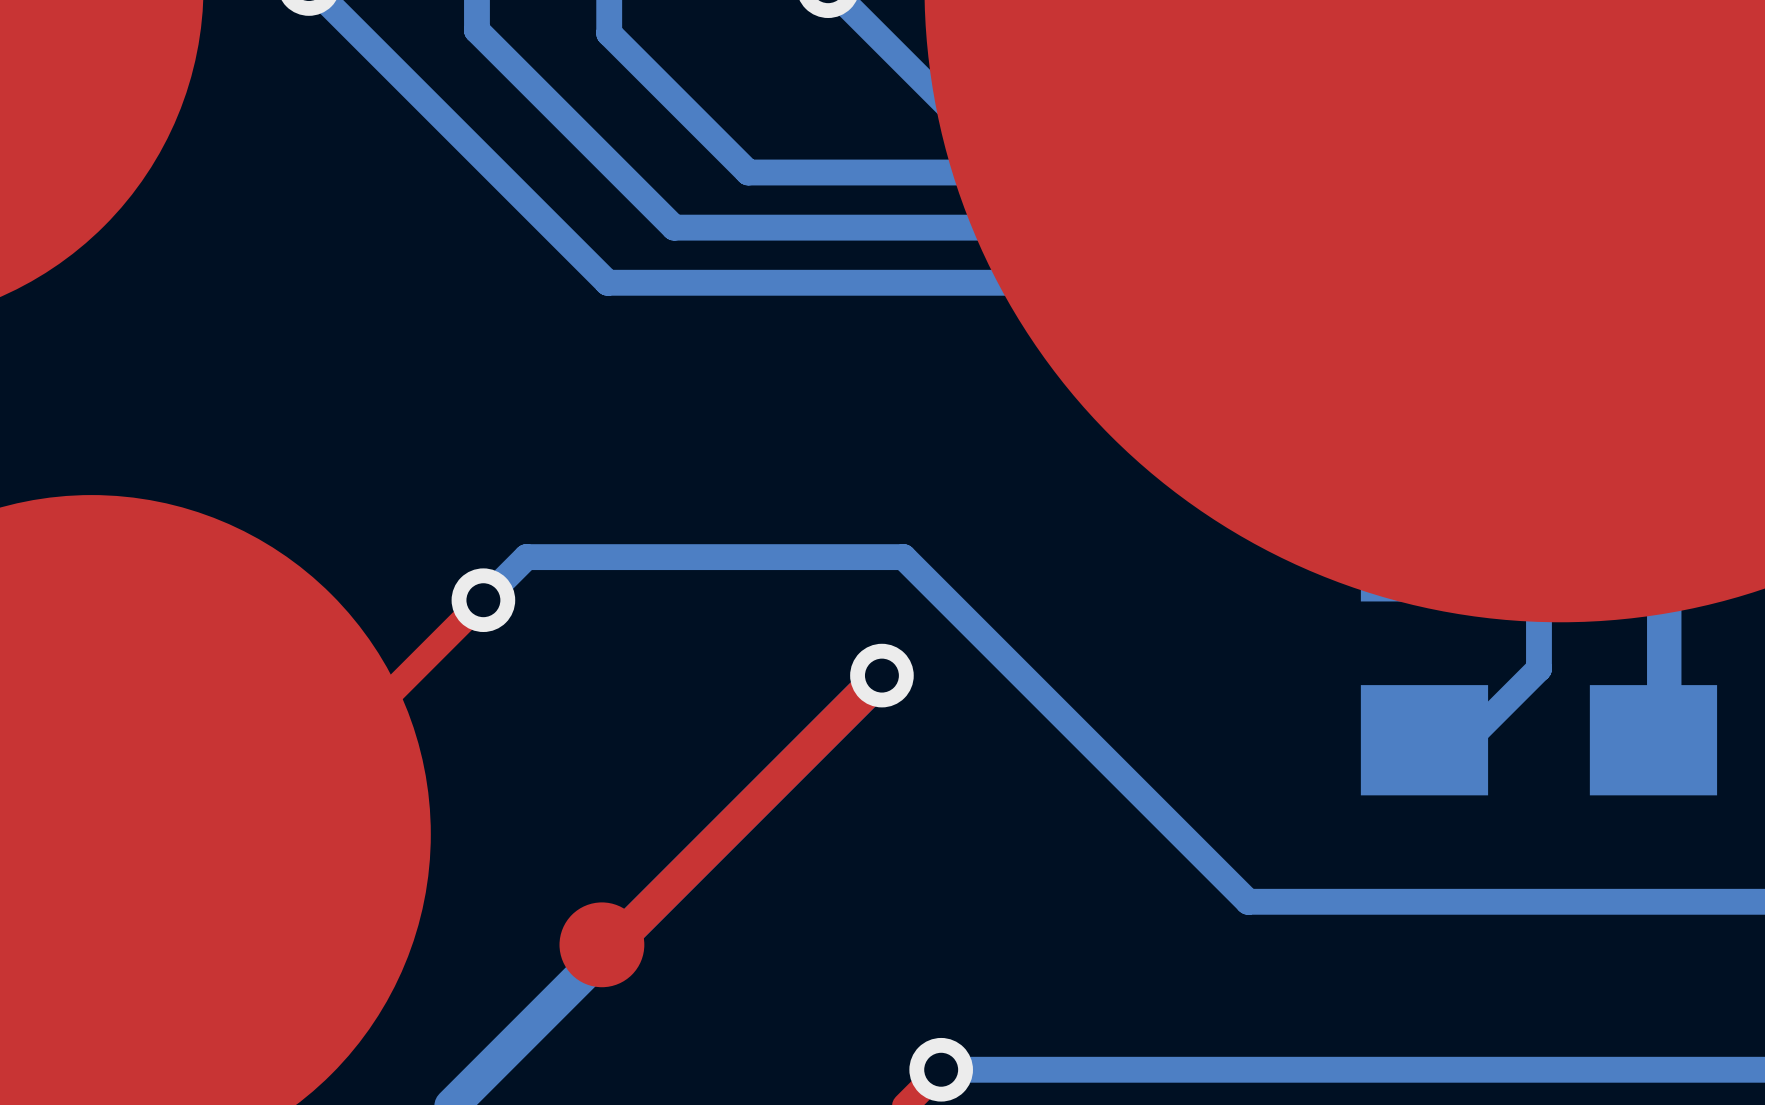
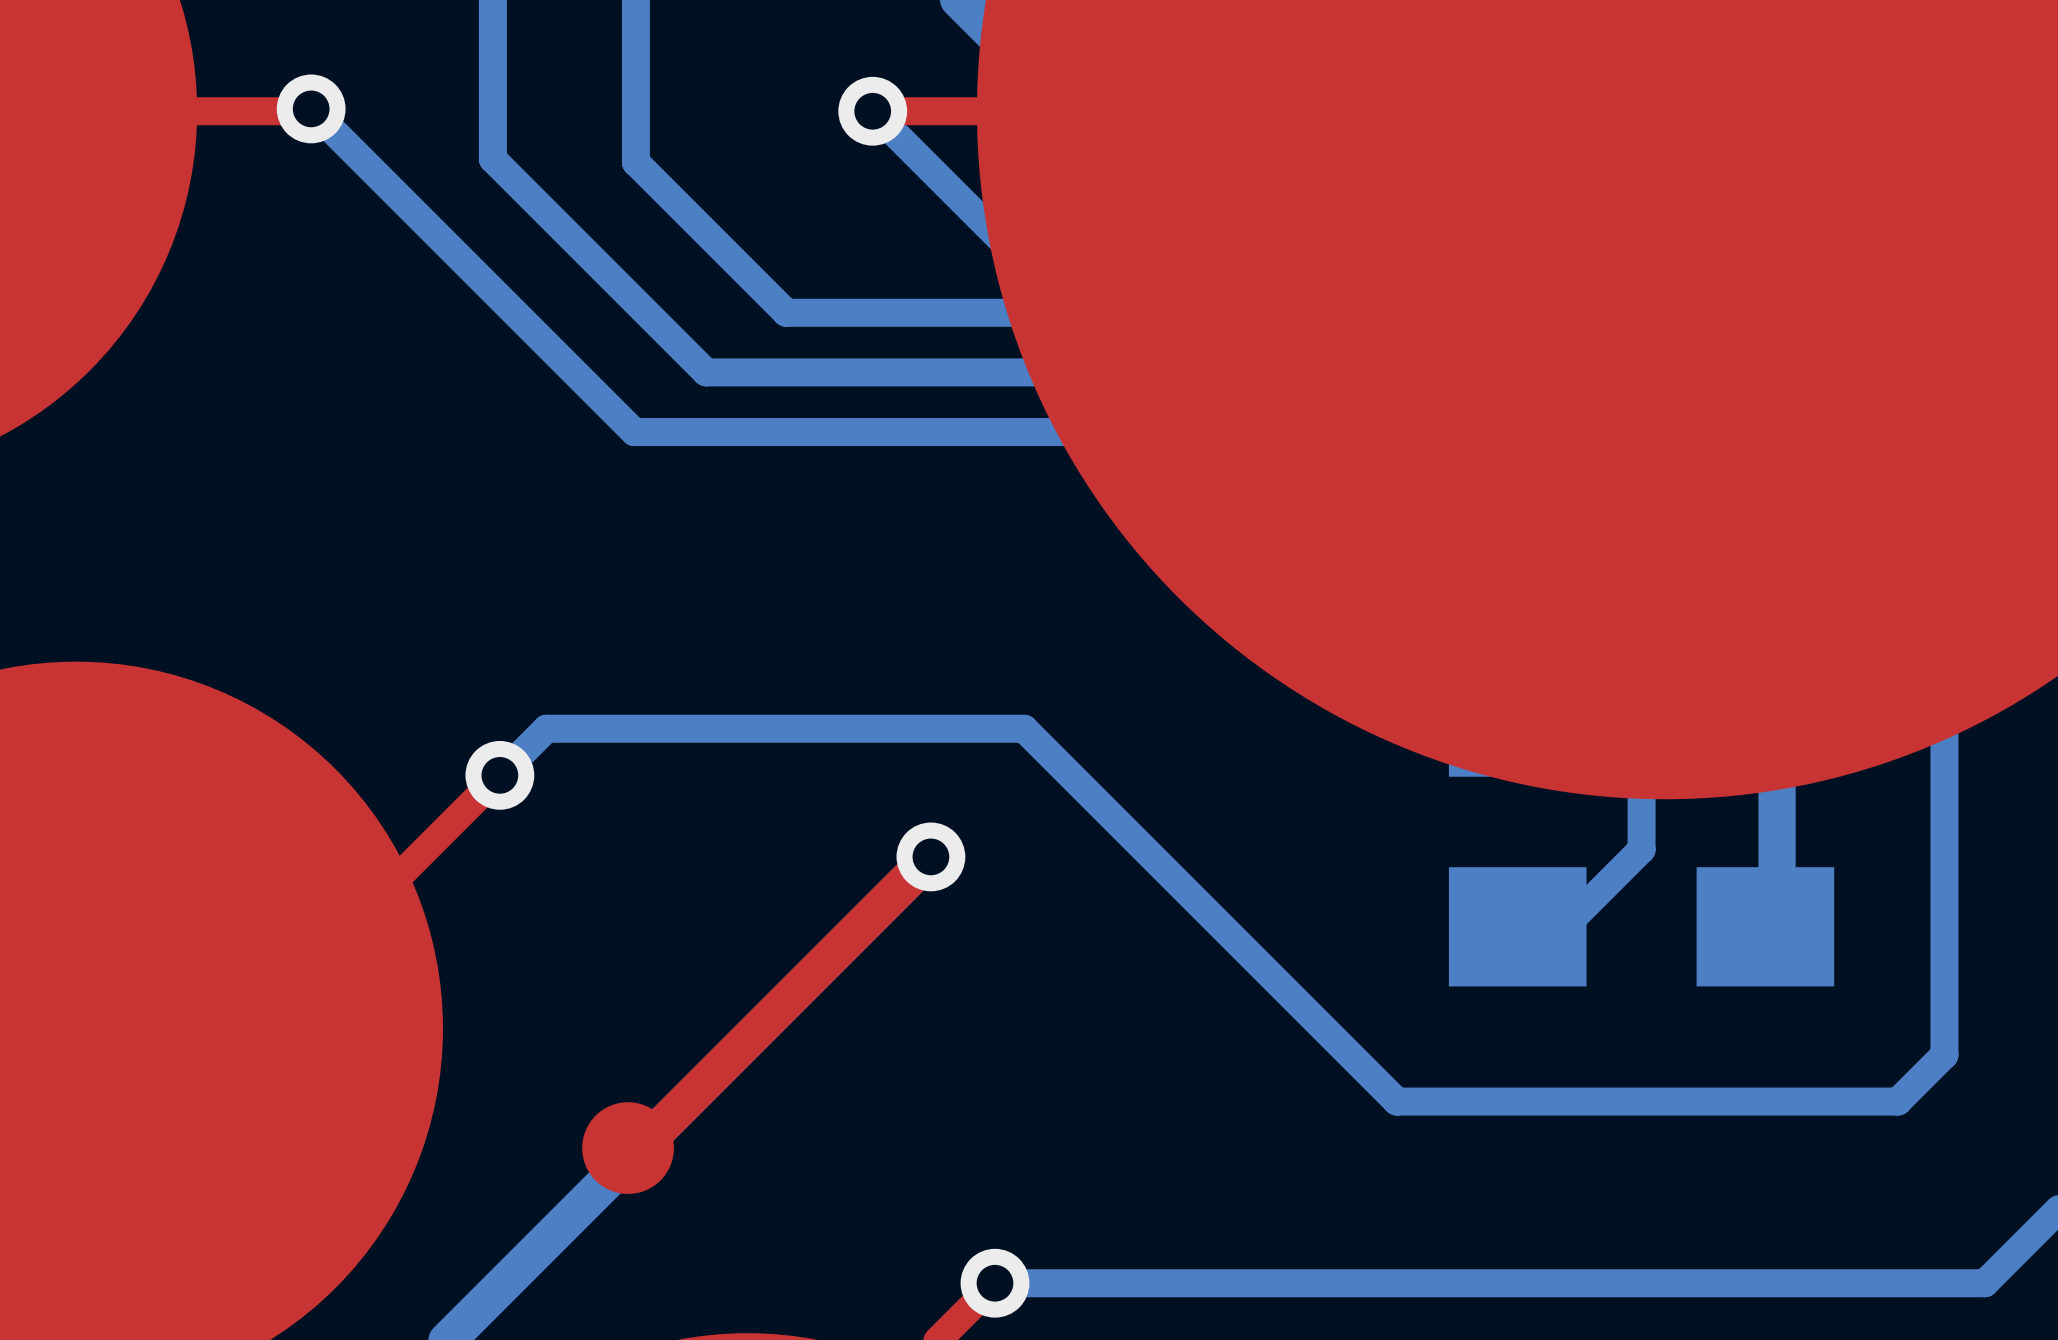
bottom track: (903, 557) (1248, 901) (1312, 901) -> (954, 728) (1024, 728) (1396, 1101)

